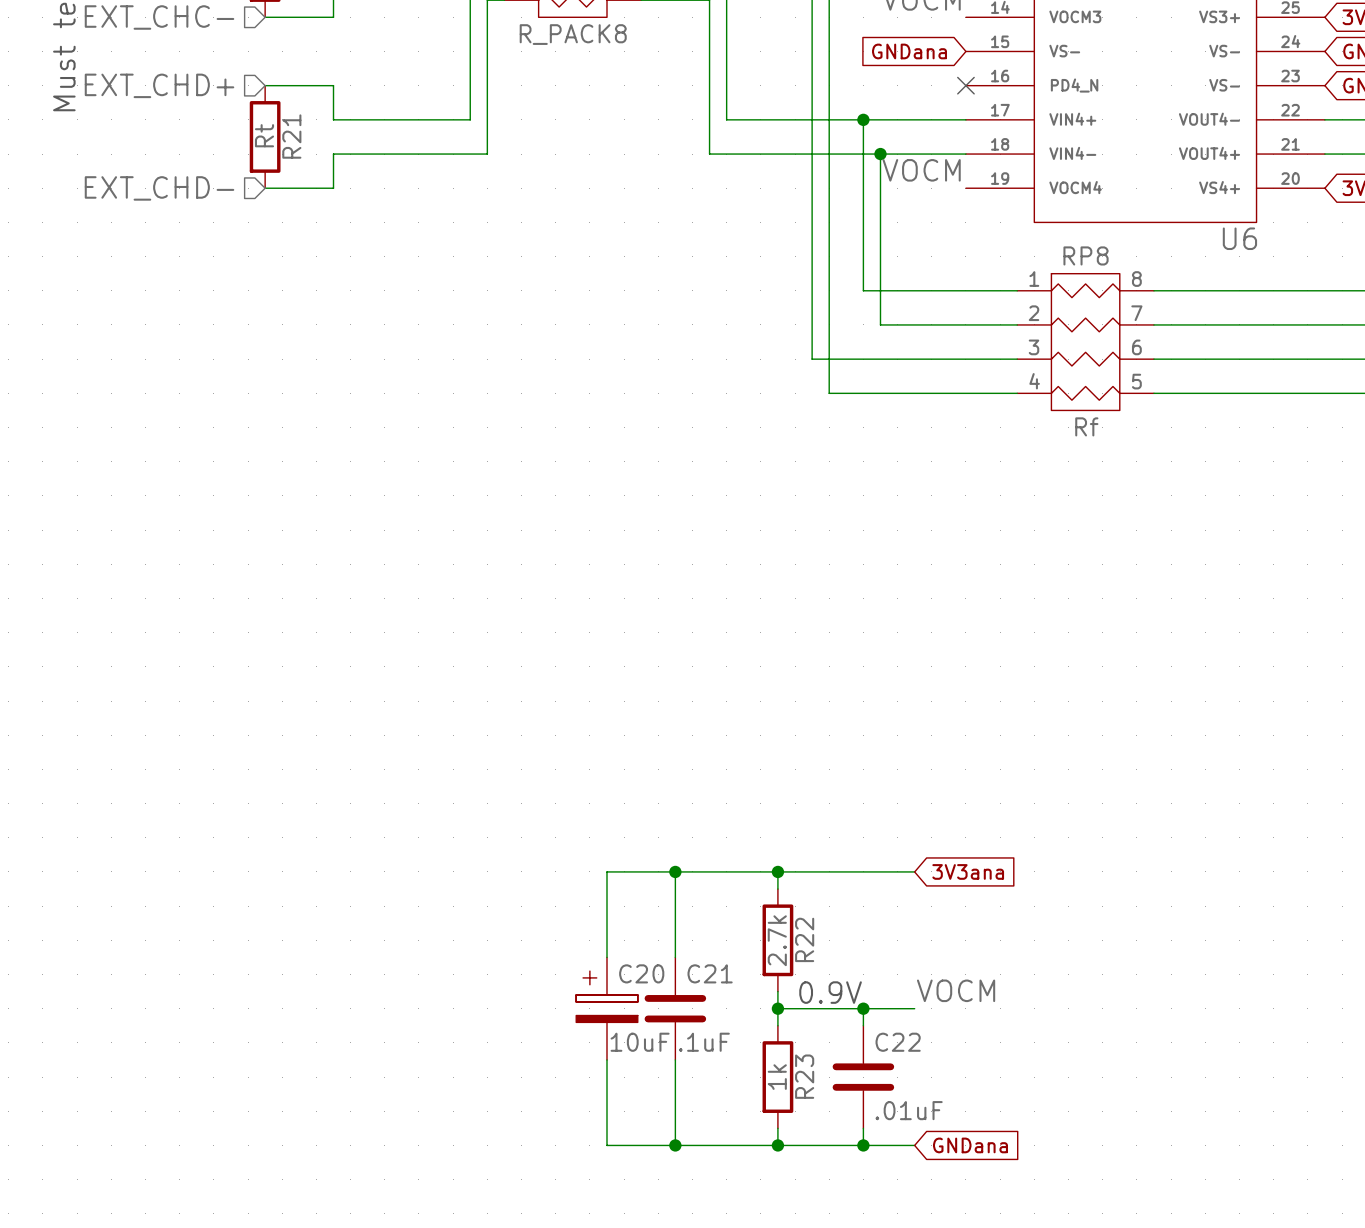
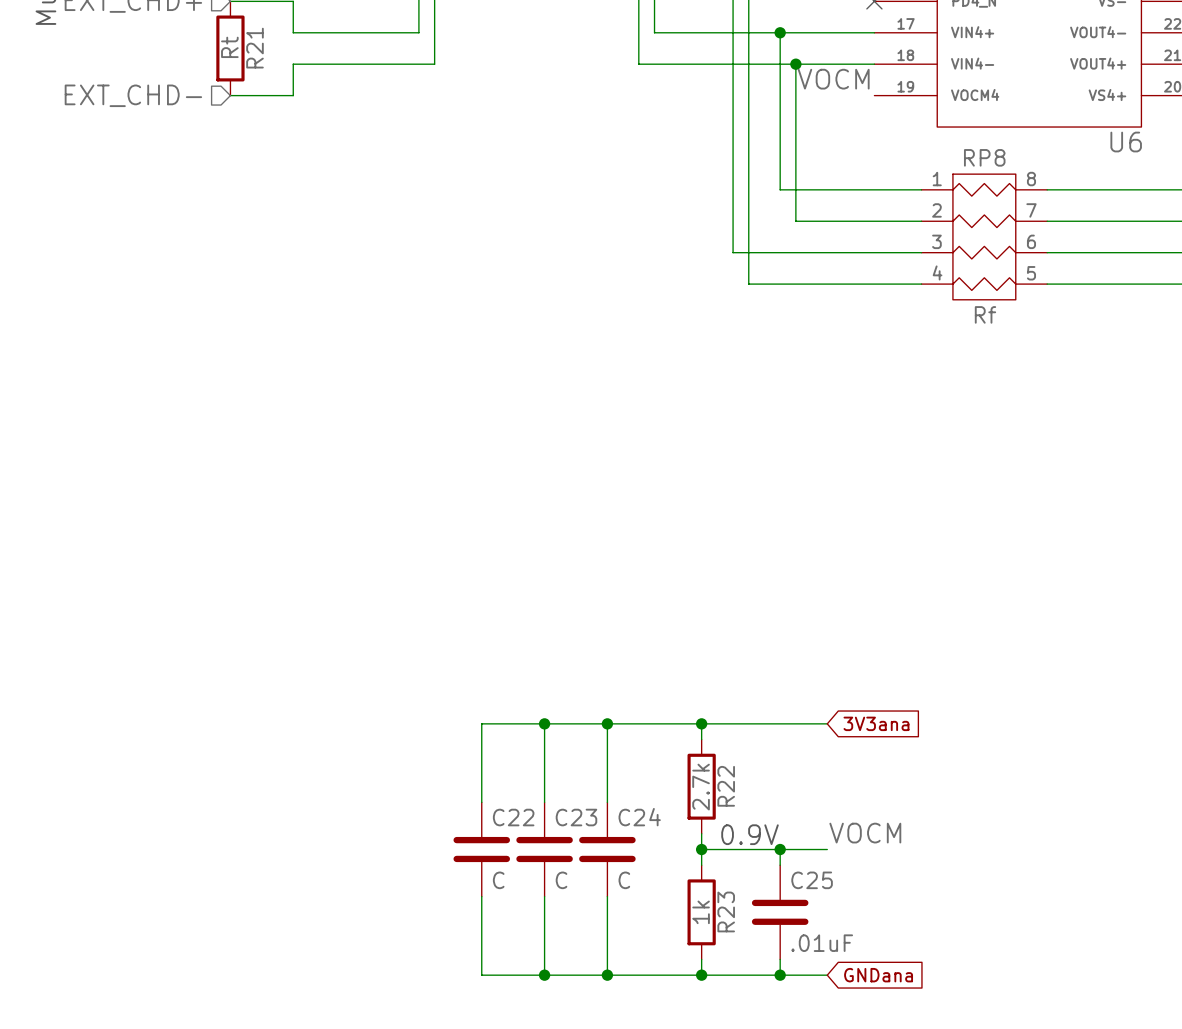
wire: none -> (544, 723) (481, 723) (481, 802)
junction: none -> (544, 723)
C21 name: C21 (710, 973) -> C24 (639, 817)
C22: none -> C (481, 849)
C20: 10uF (606, 1008) -> none
C23: none -> C (544, 849)
C21 value: .1uF (704, 1042) -> C (624, 880)
C22 name: C22 (898, 1042) -> C25 (812, 880)
wire: none -> (481, 896) (481, 975) (544, 975)
junction: none -> (544, 975)

